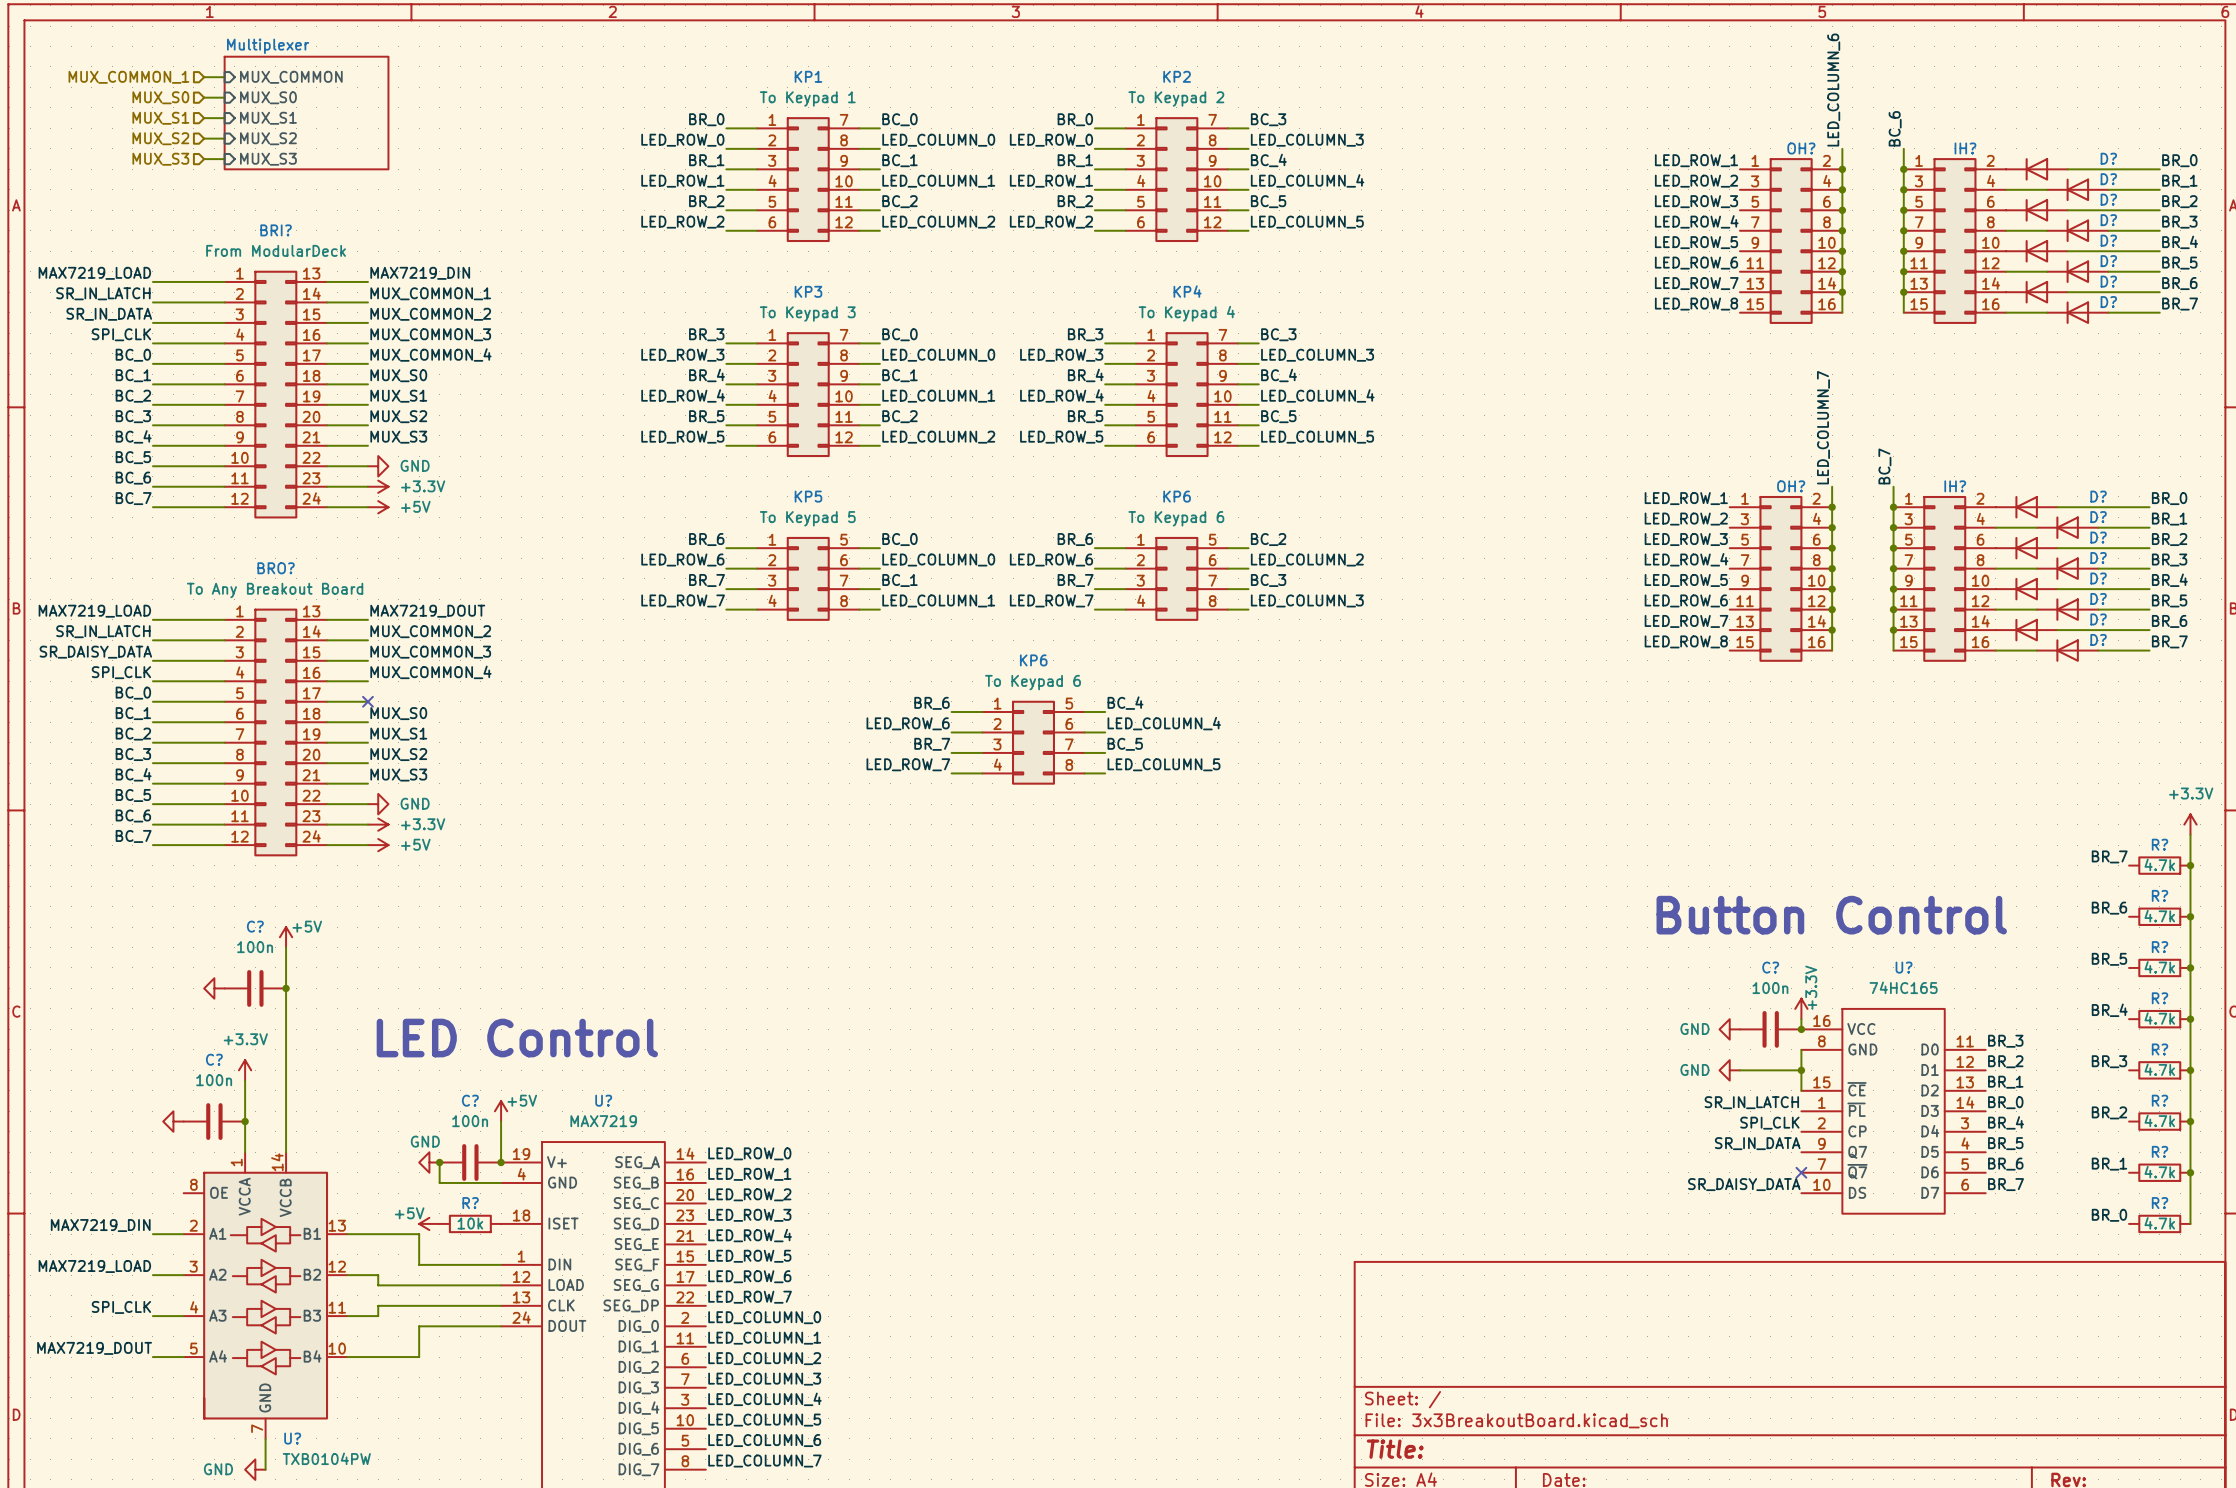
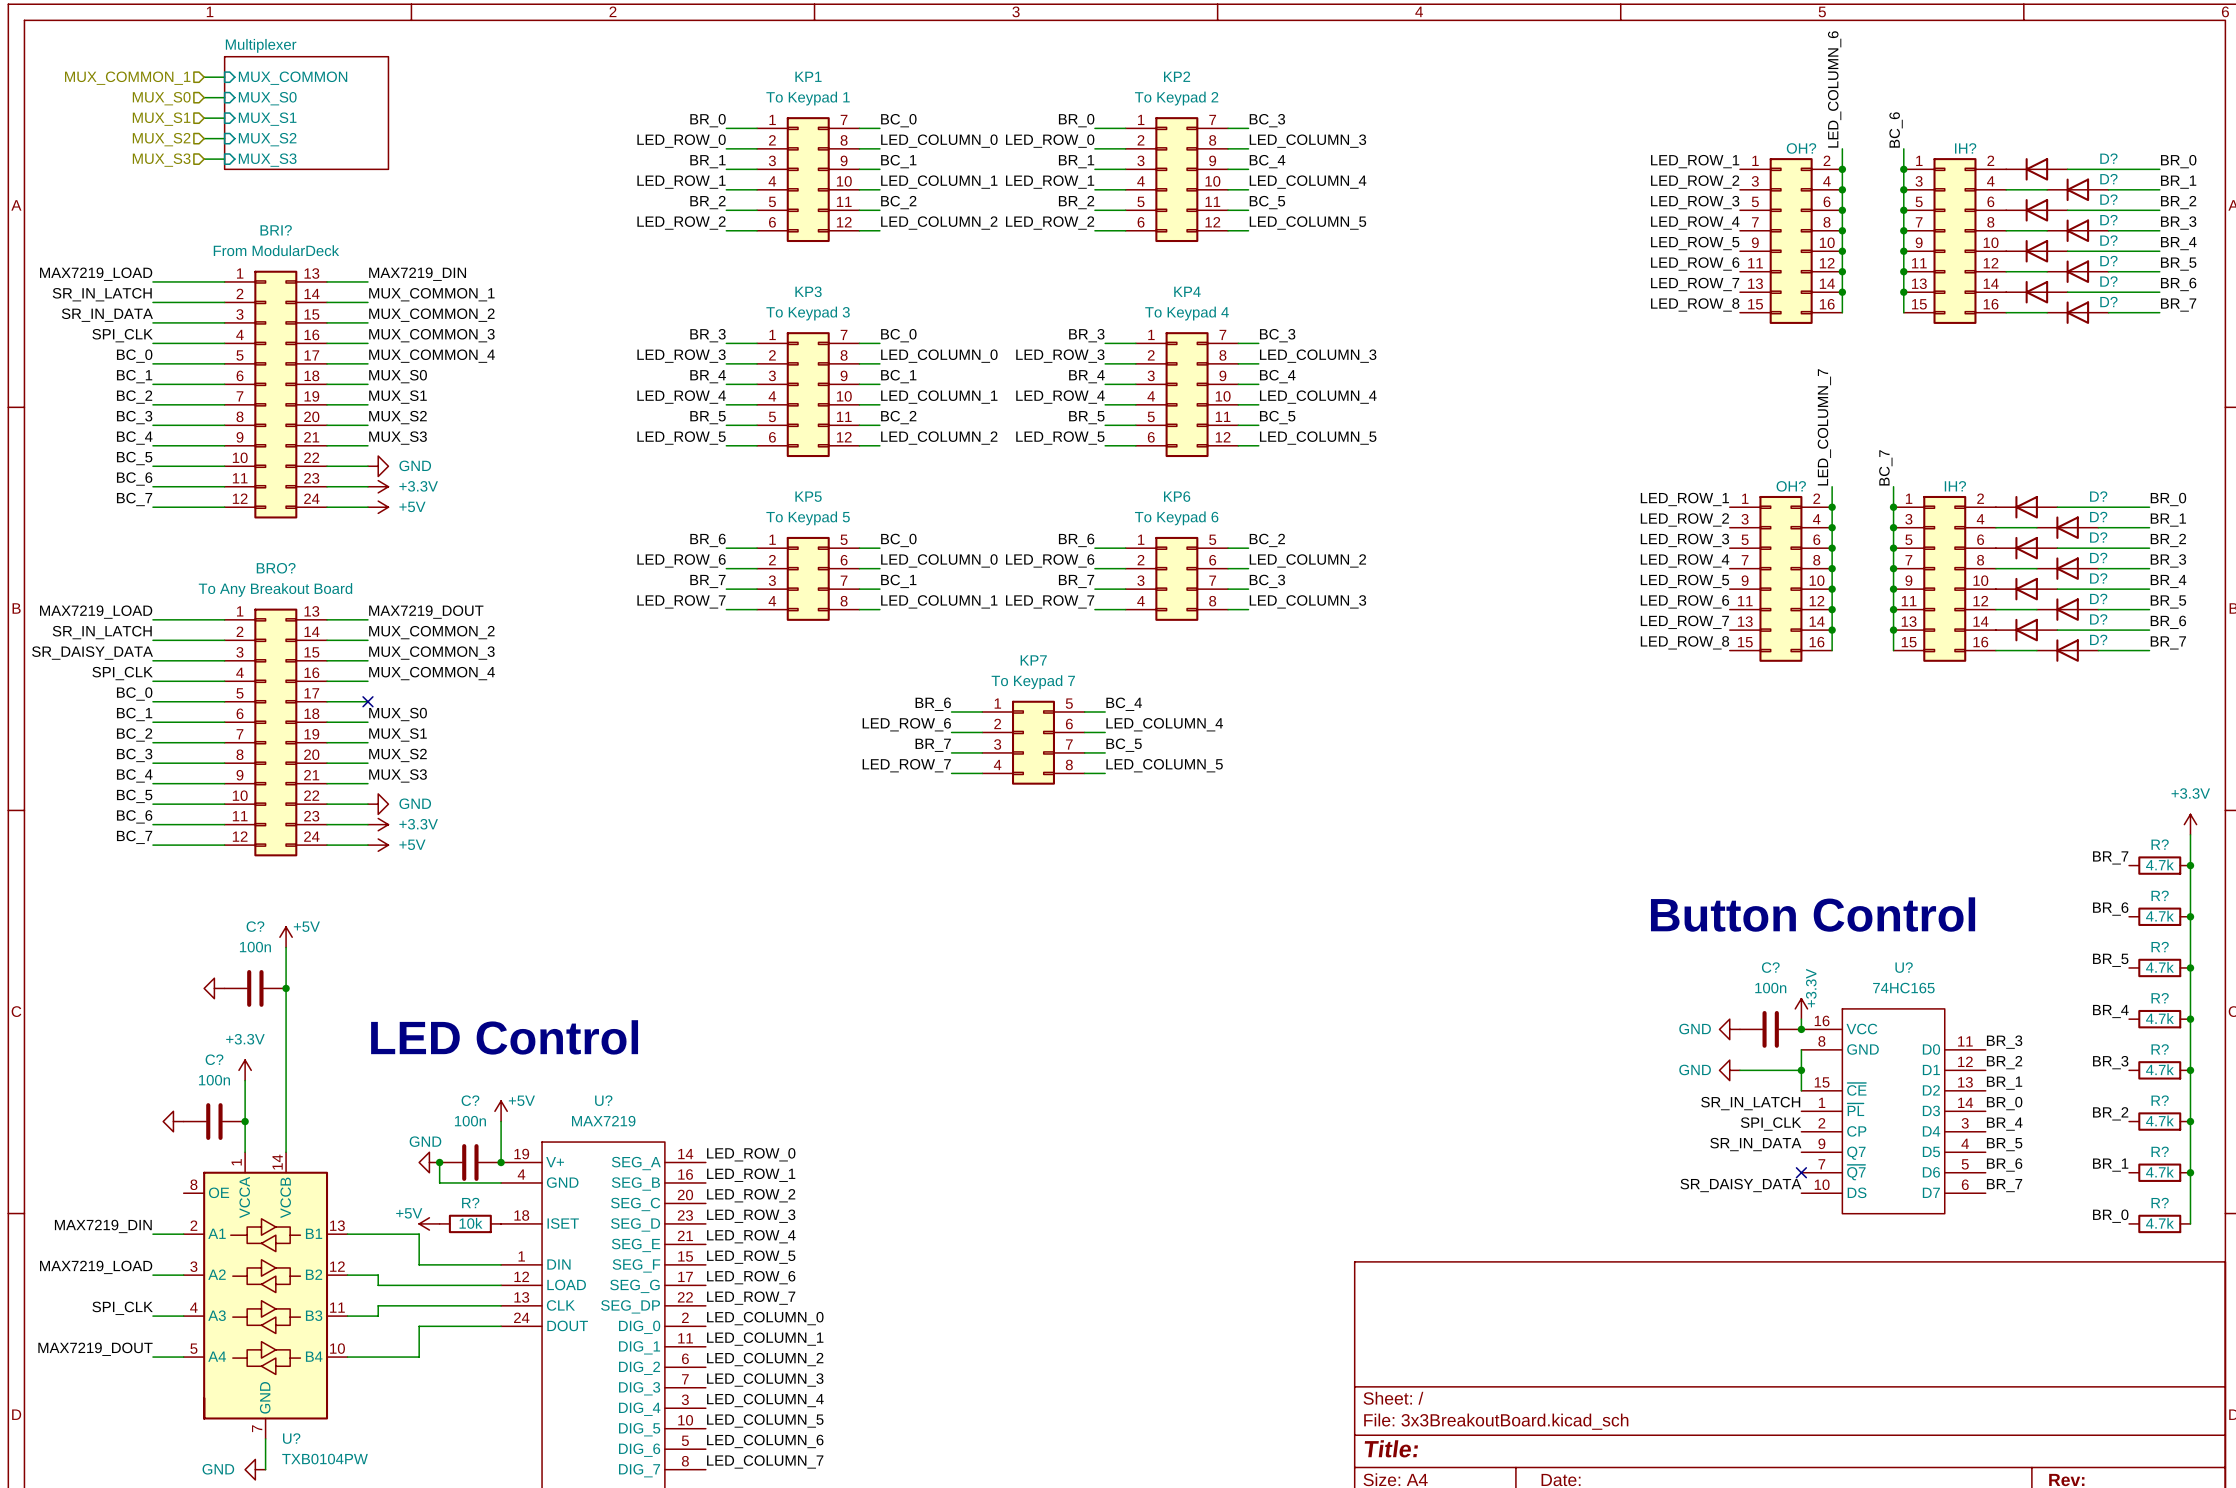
KP6 name: KP6 (1033, 660) -> KP7 (1033, 660)
KP6 text: To Keypad 6 (1033, 682) -> To Keypad 7 (1033, 682)

